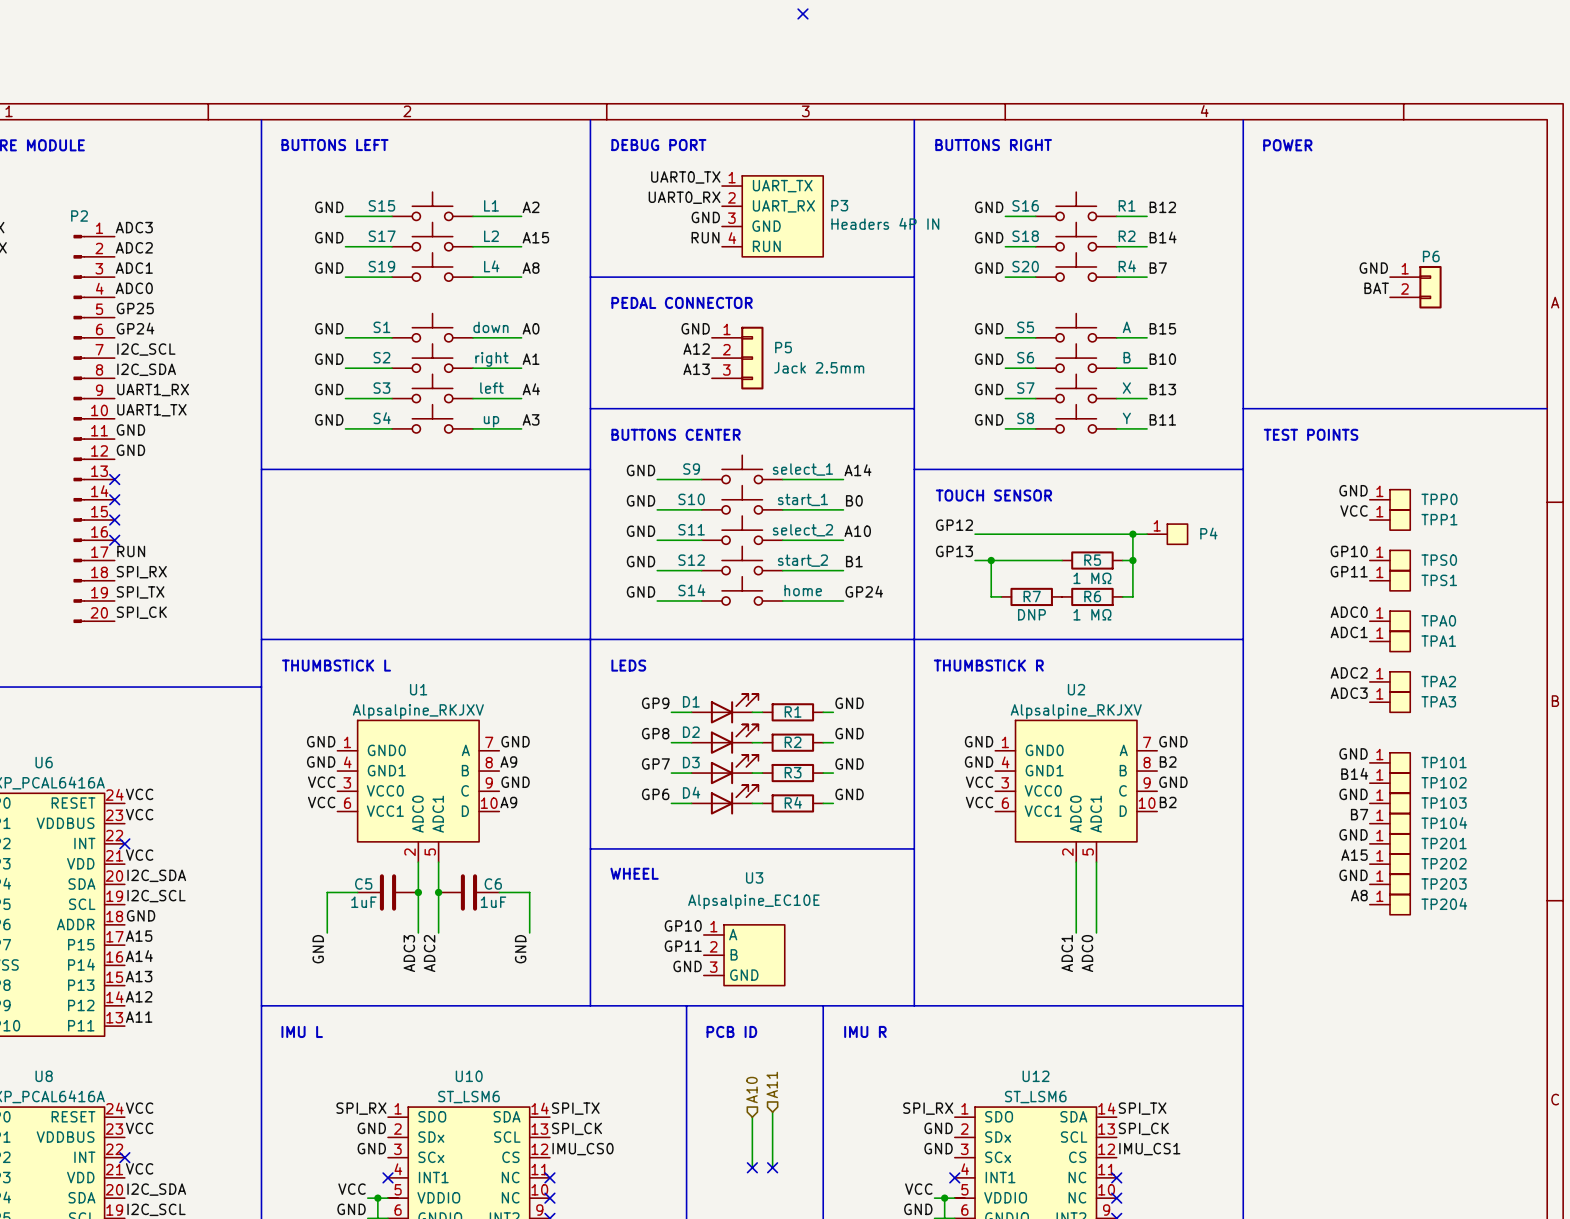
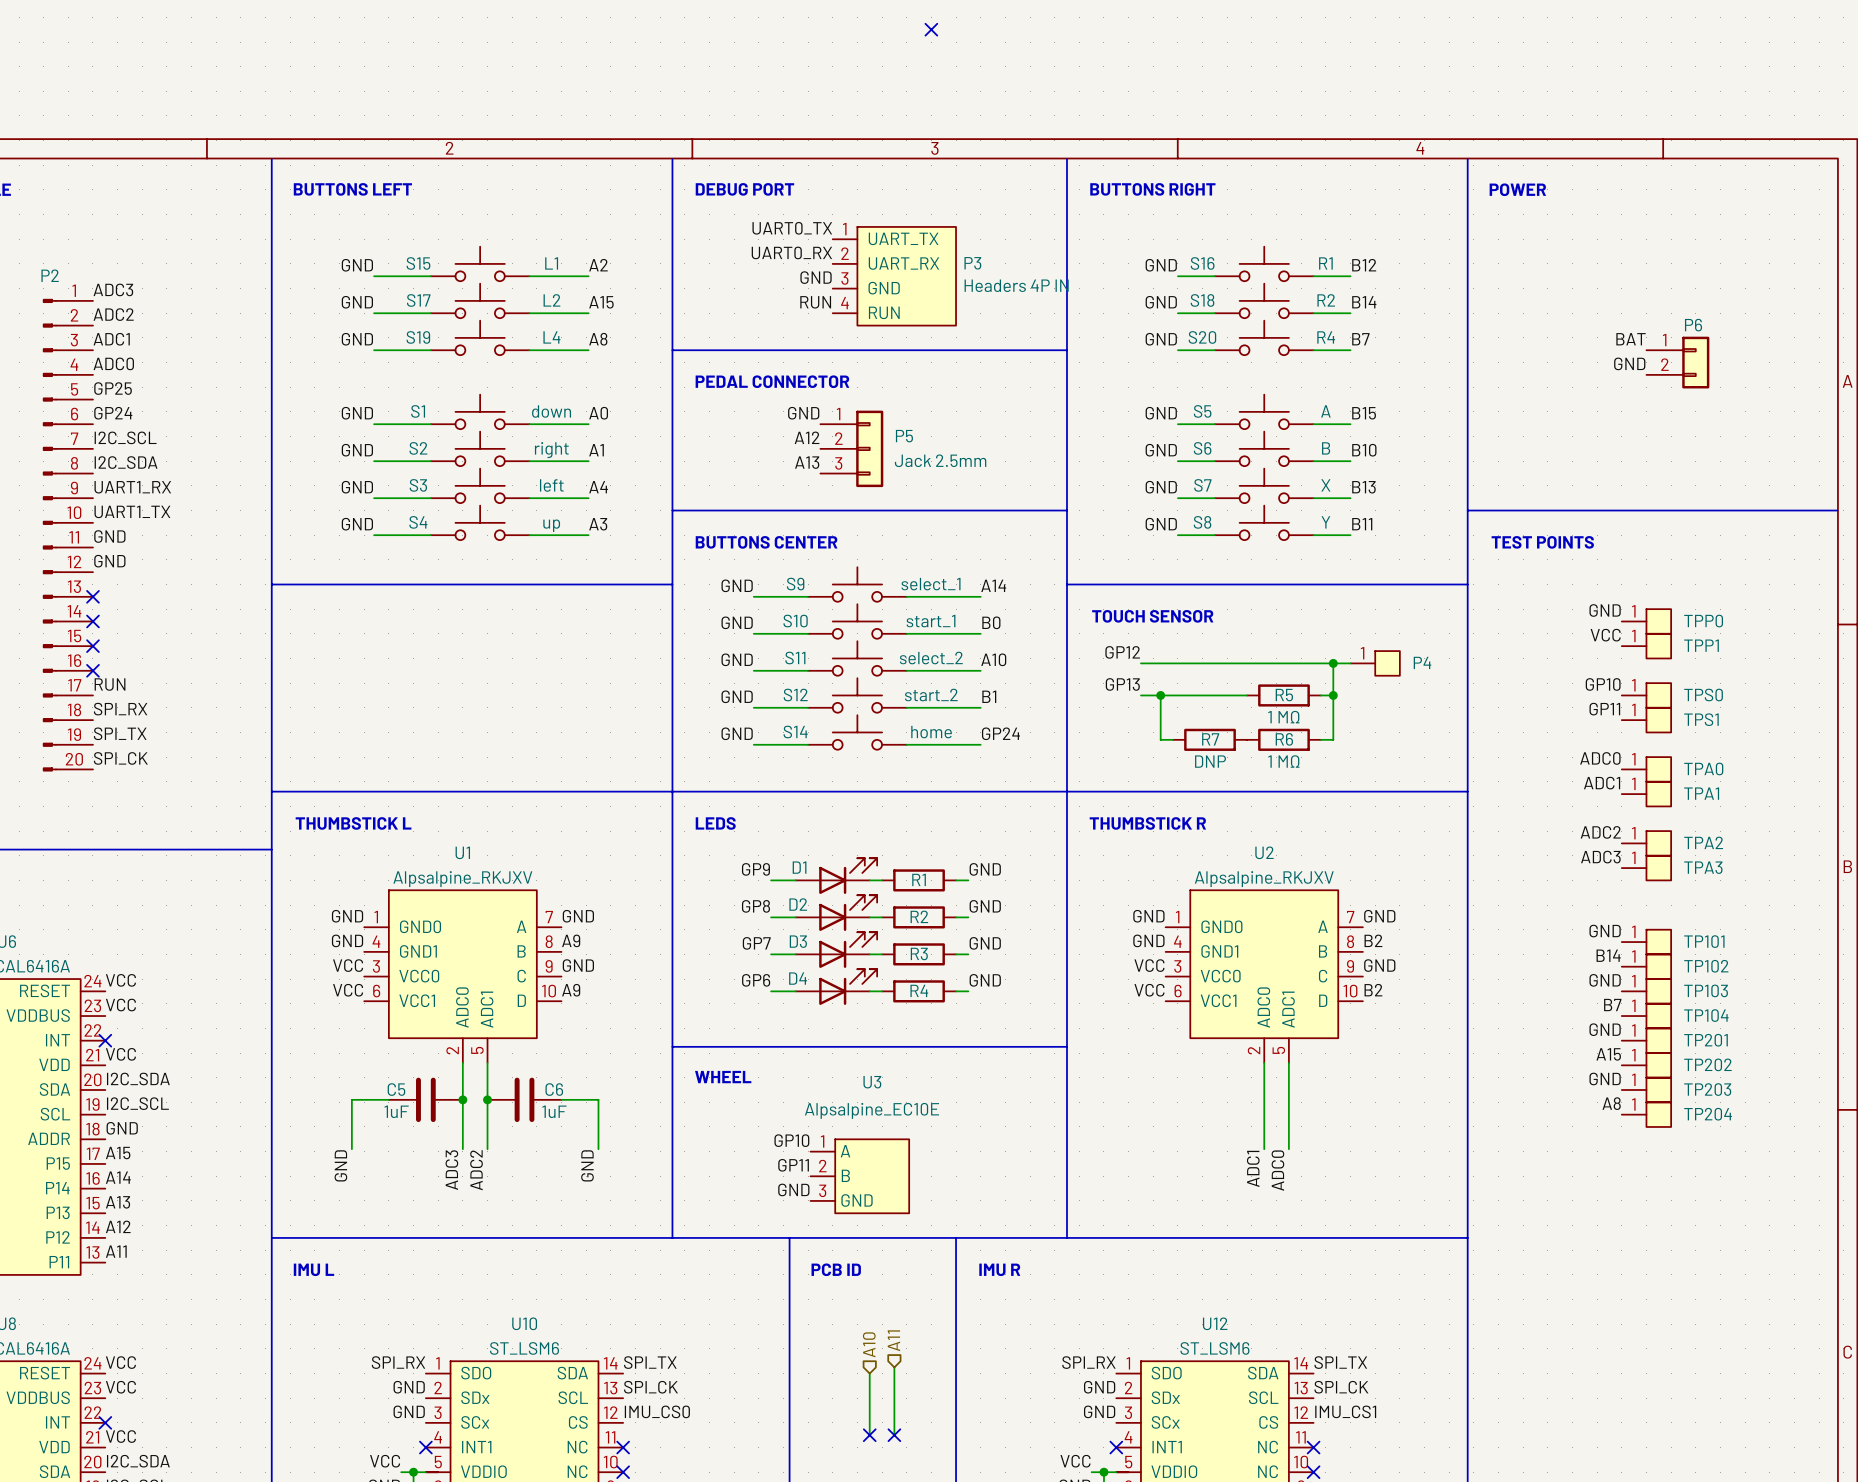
label: GND (1373, 268) -> BAT (1631, 339)
label: BAT (1376, 288) -> GND (1629, 363)

